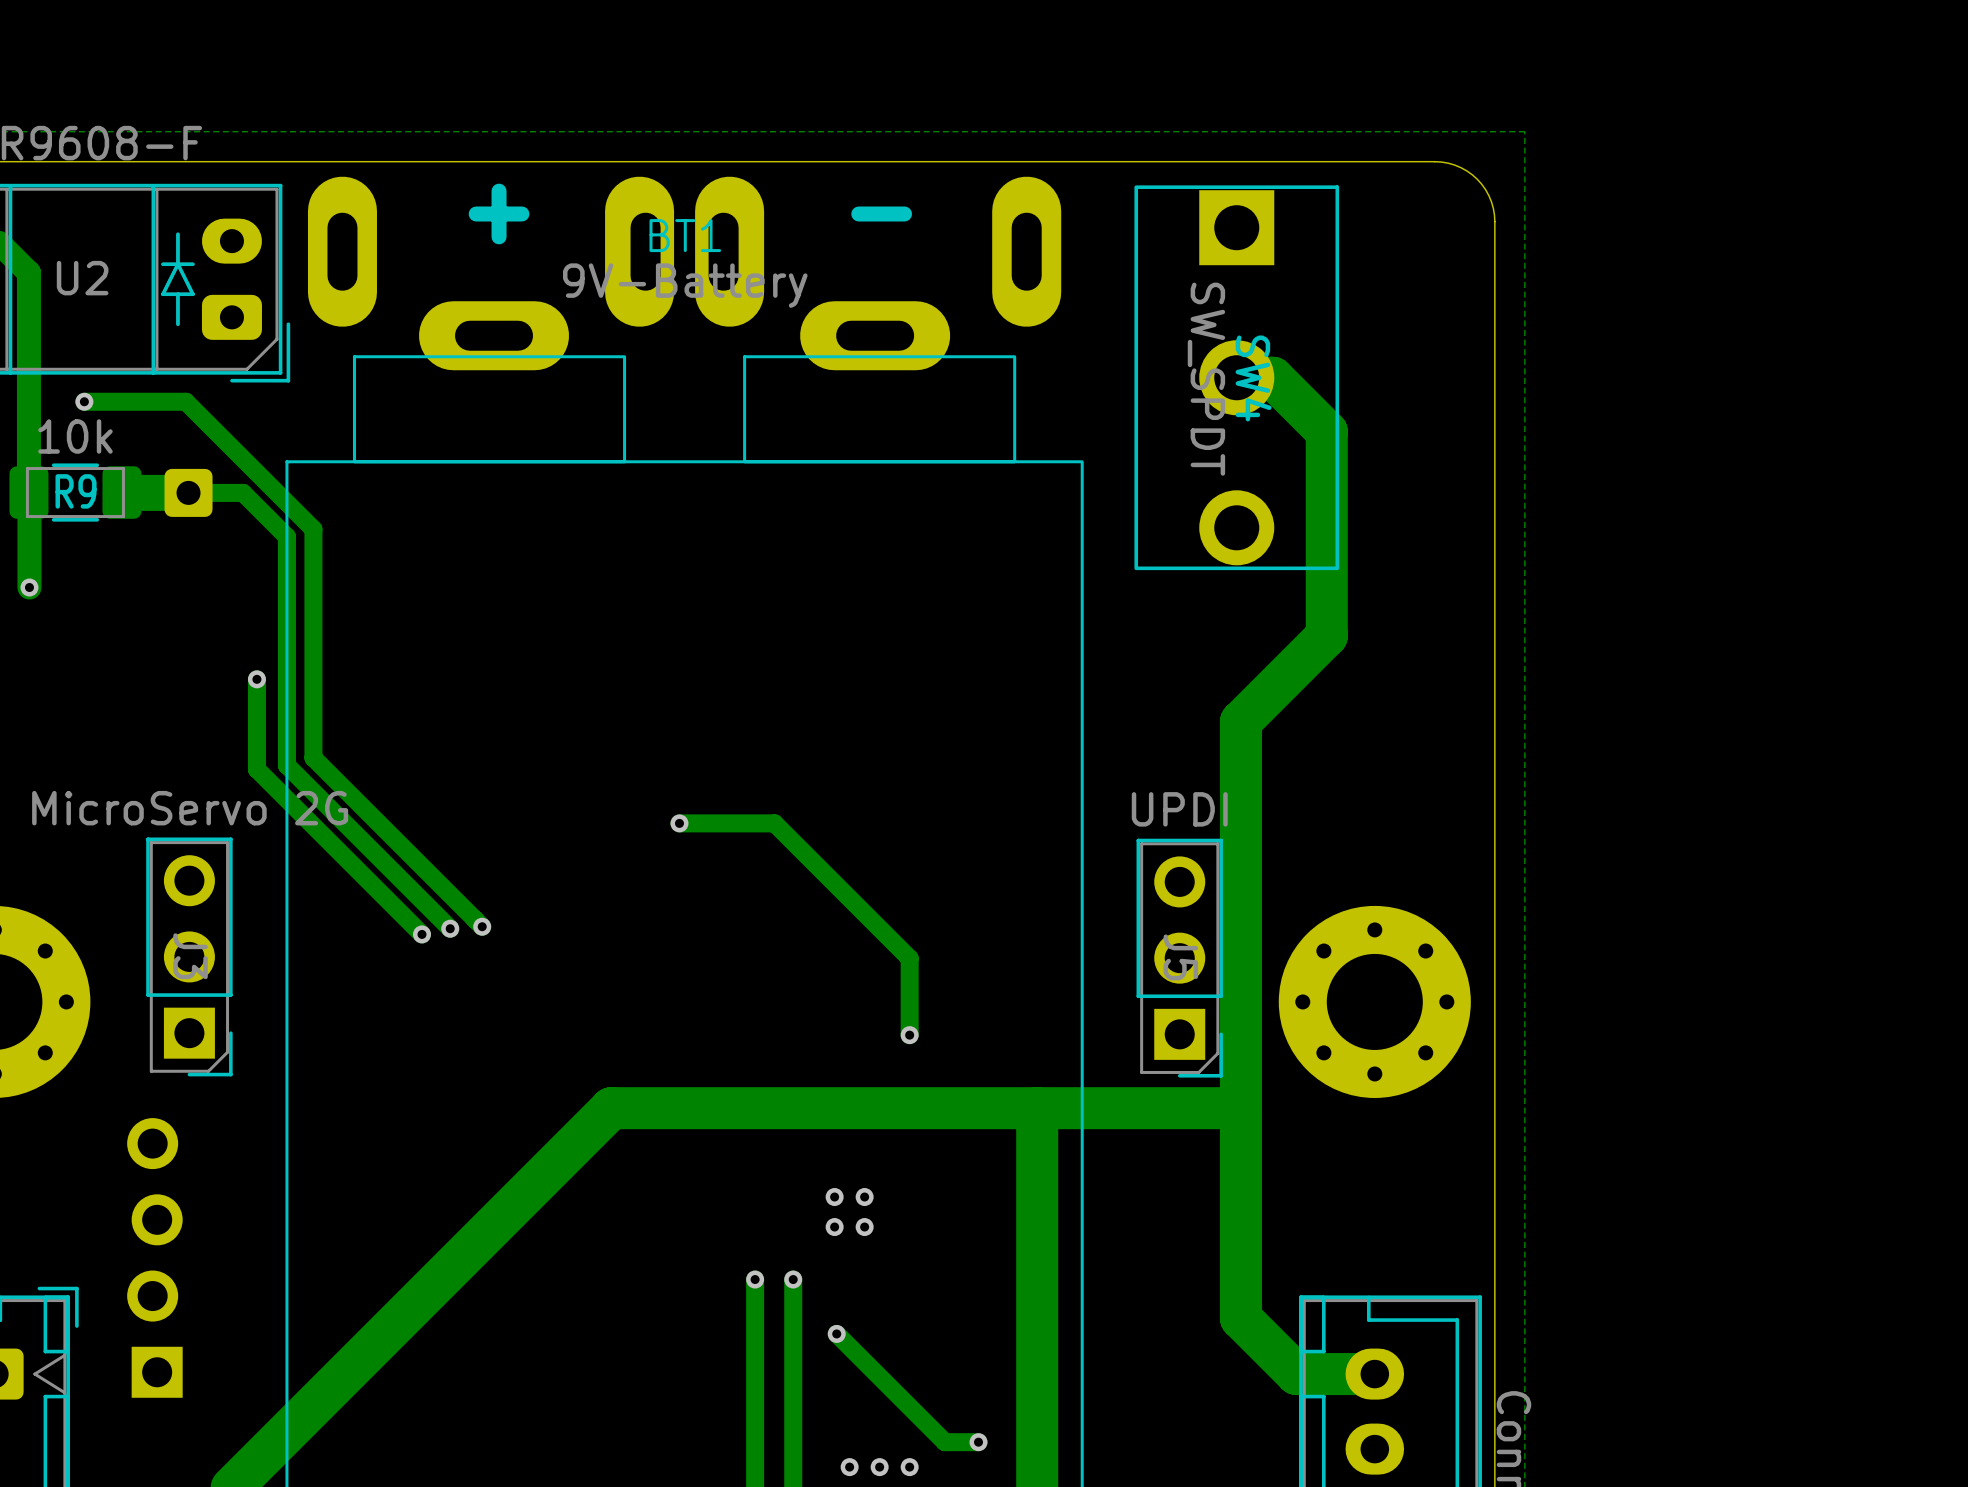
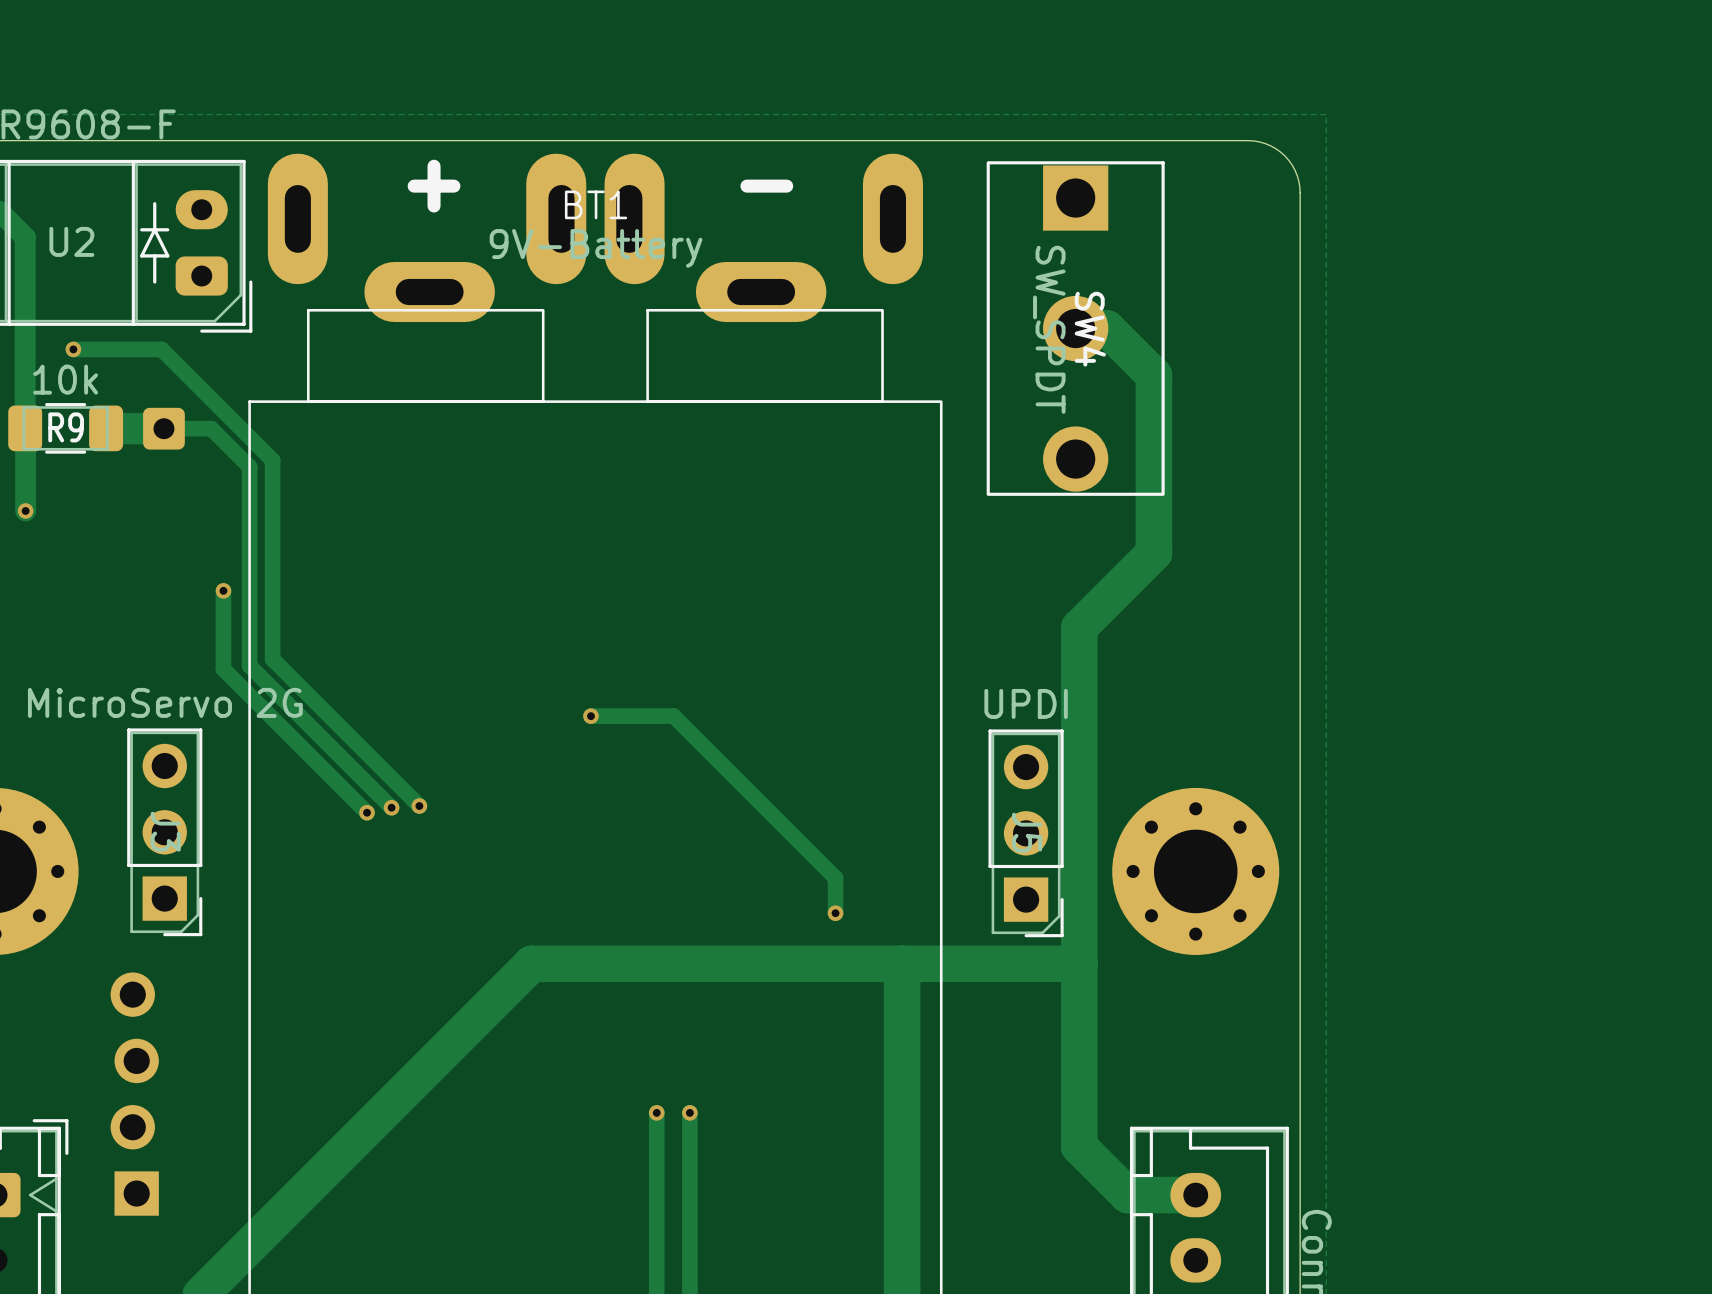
track: (909, 958) (909, 1035) -> (791, 833) (835, 877) (835, 913)
via position: (909, 1035) -> (835, 913)
via: (834, 1197) -> none
via: (864, 1197) -> none
via: (834, 1227) -> none
via: (864, 1227) -> none
track: (836, 1333) (944, 1442) (978, 1442) -> none
via: (836, 1333) -> none
via: (978, 1442) -> none
via: (849, 1467) -> none
via: (879, 1467) -> none
via: (909, 1467) -> none

